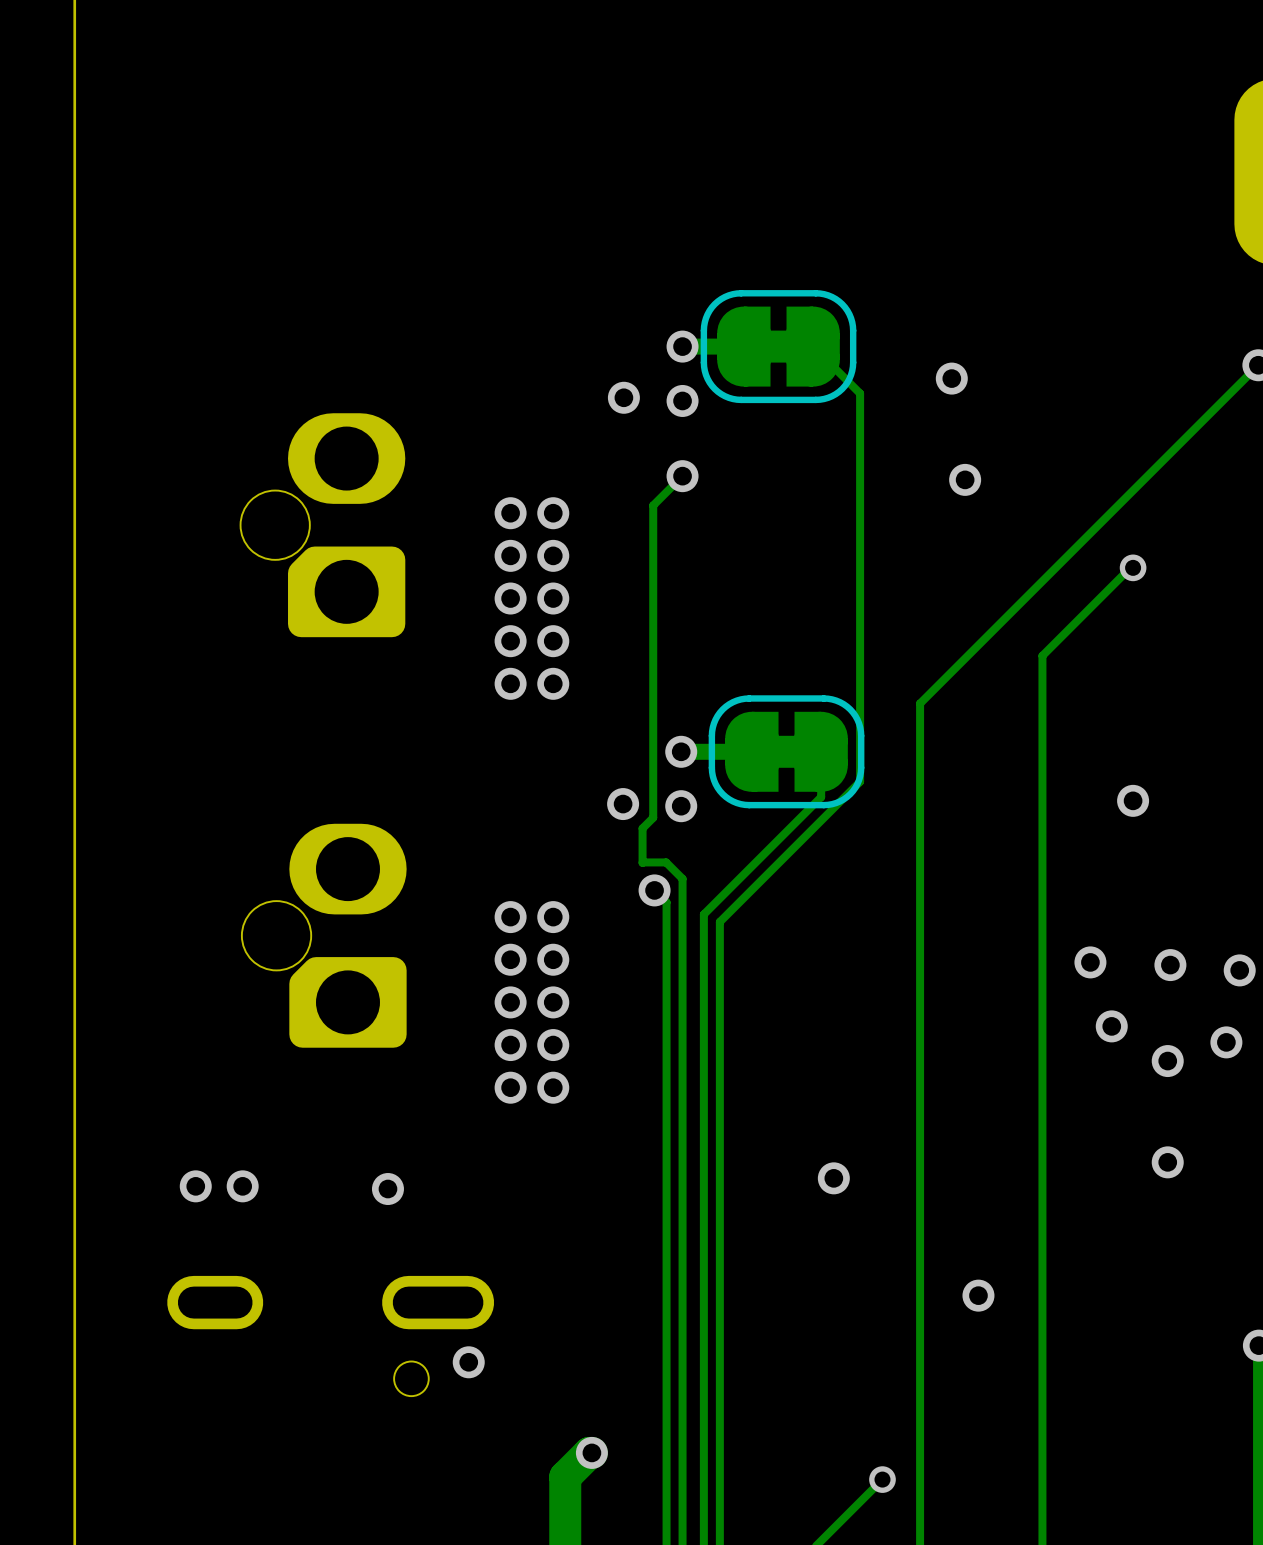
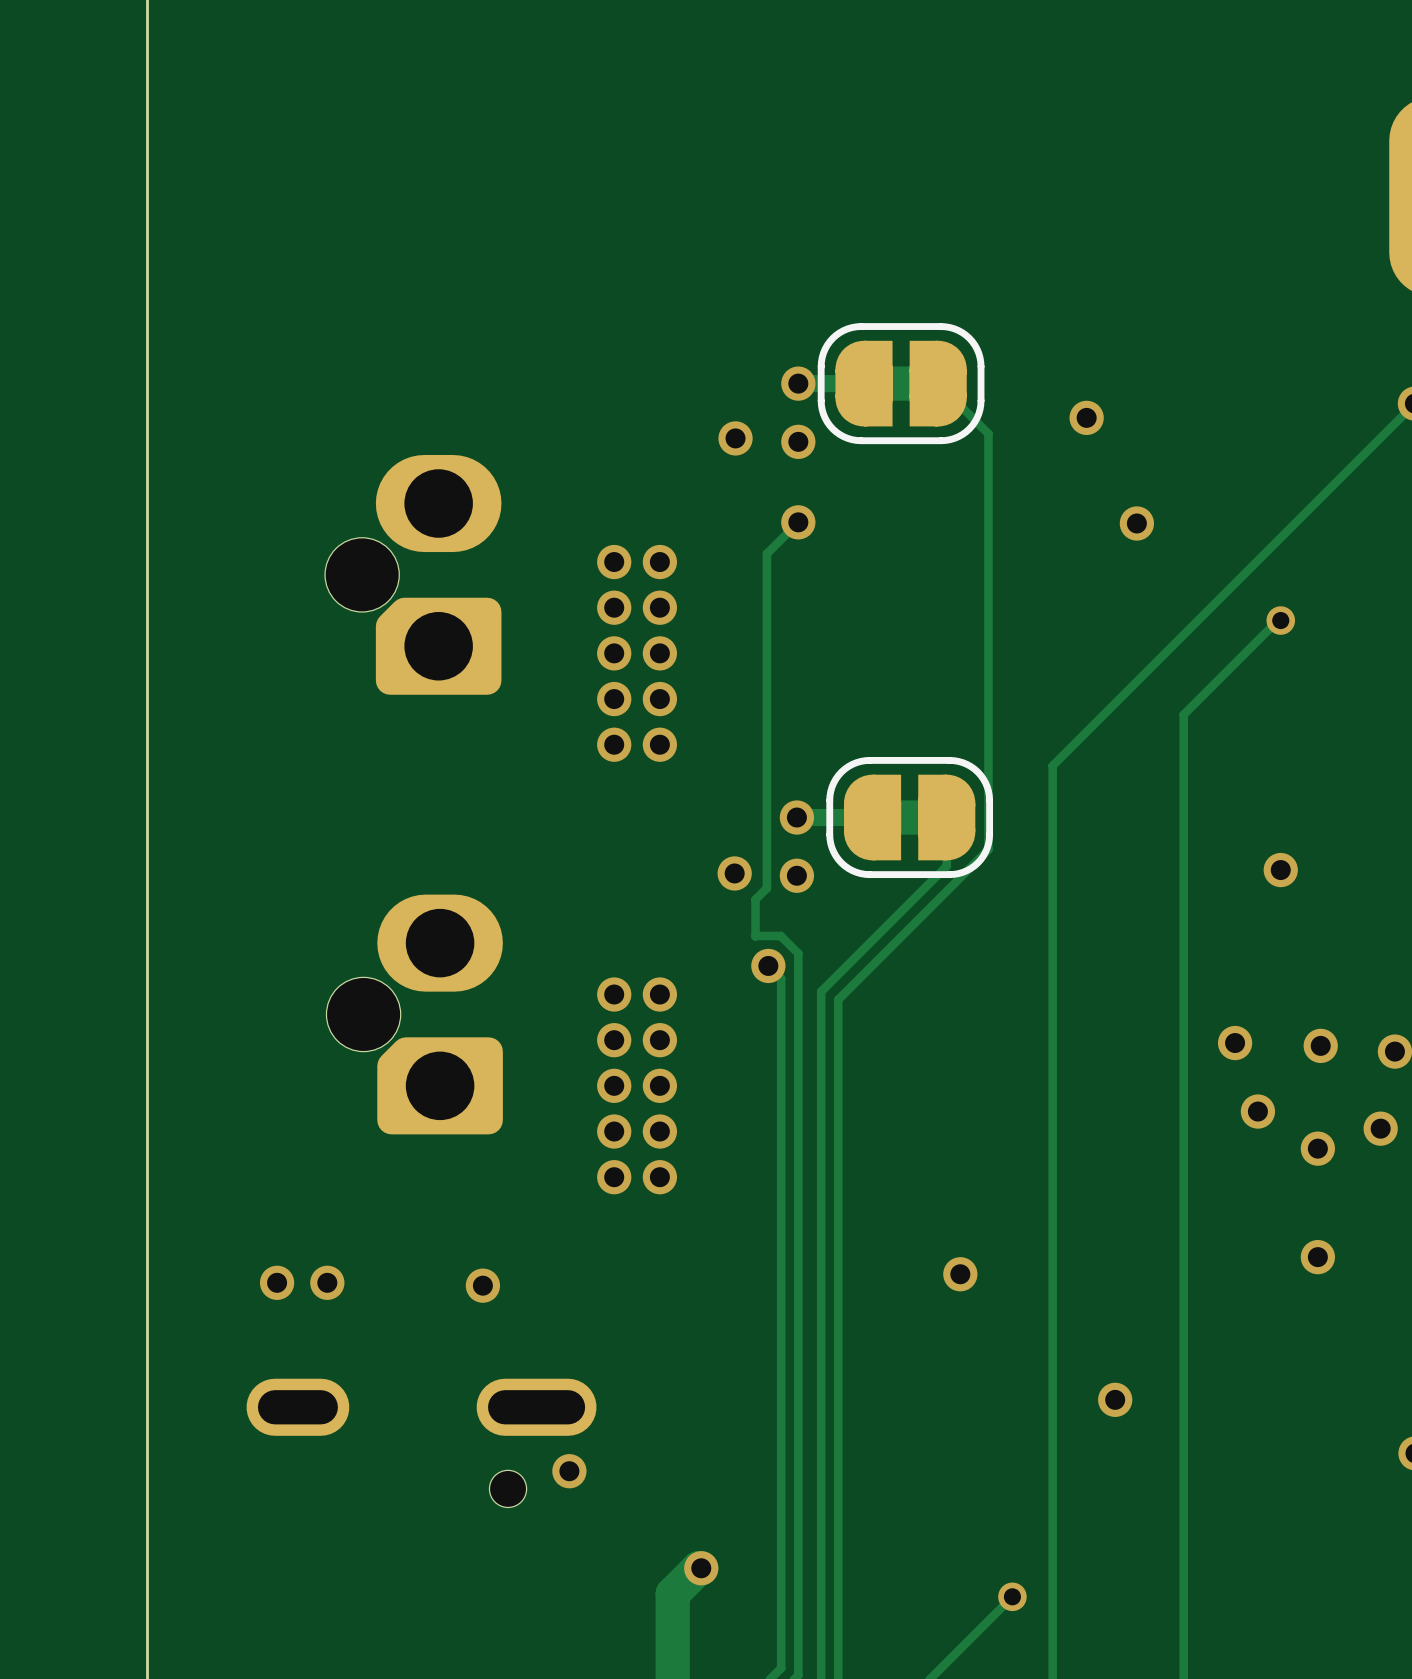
via position: (965, 479) -> (1136, 523)

